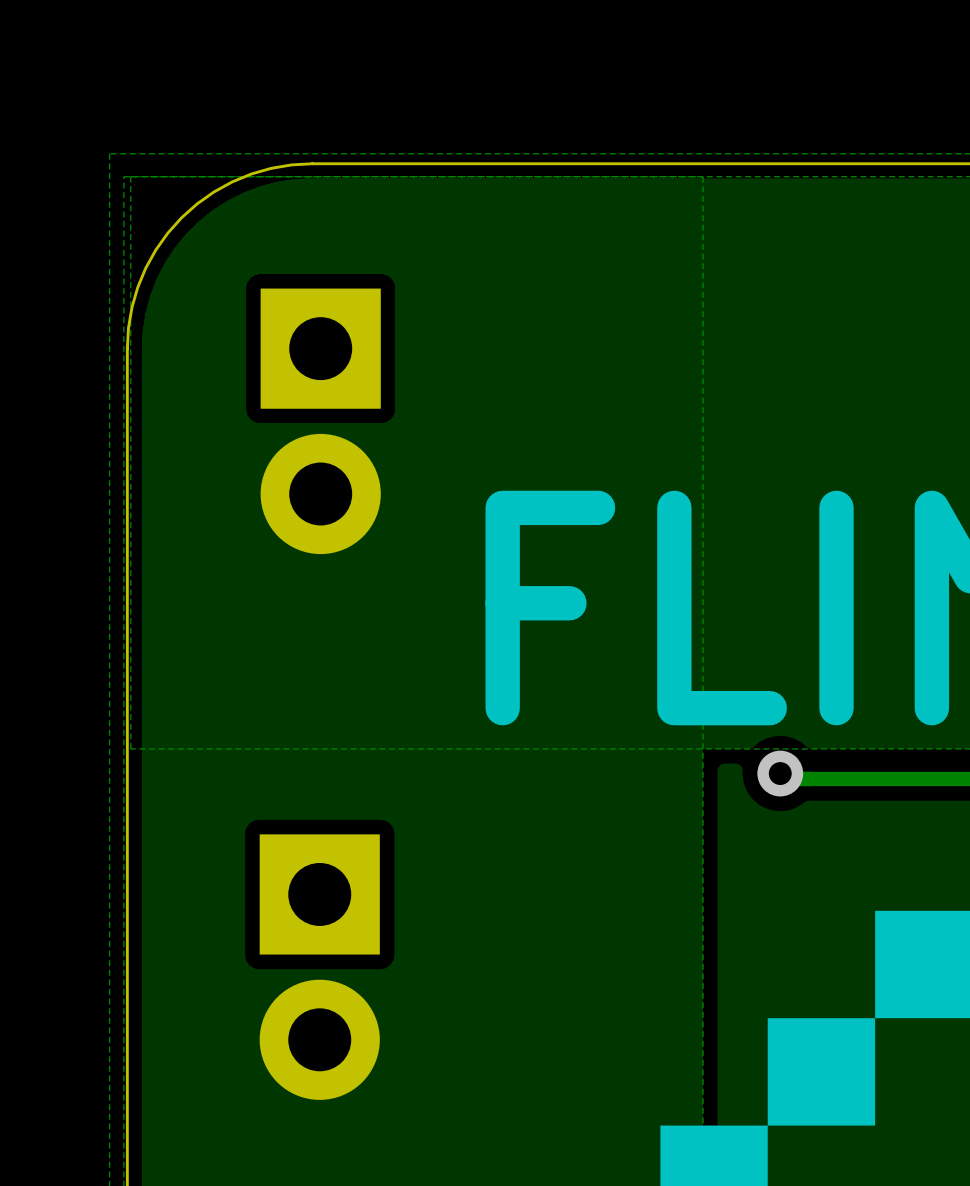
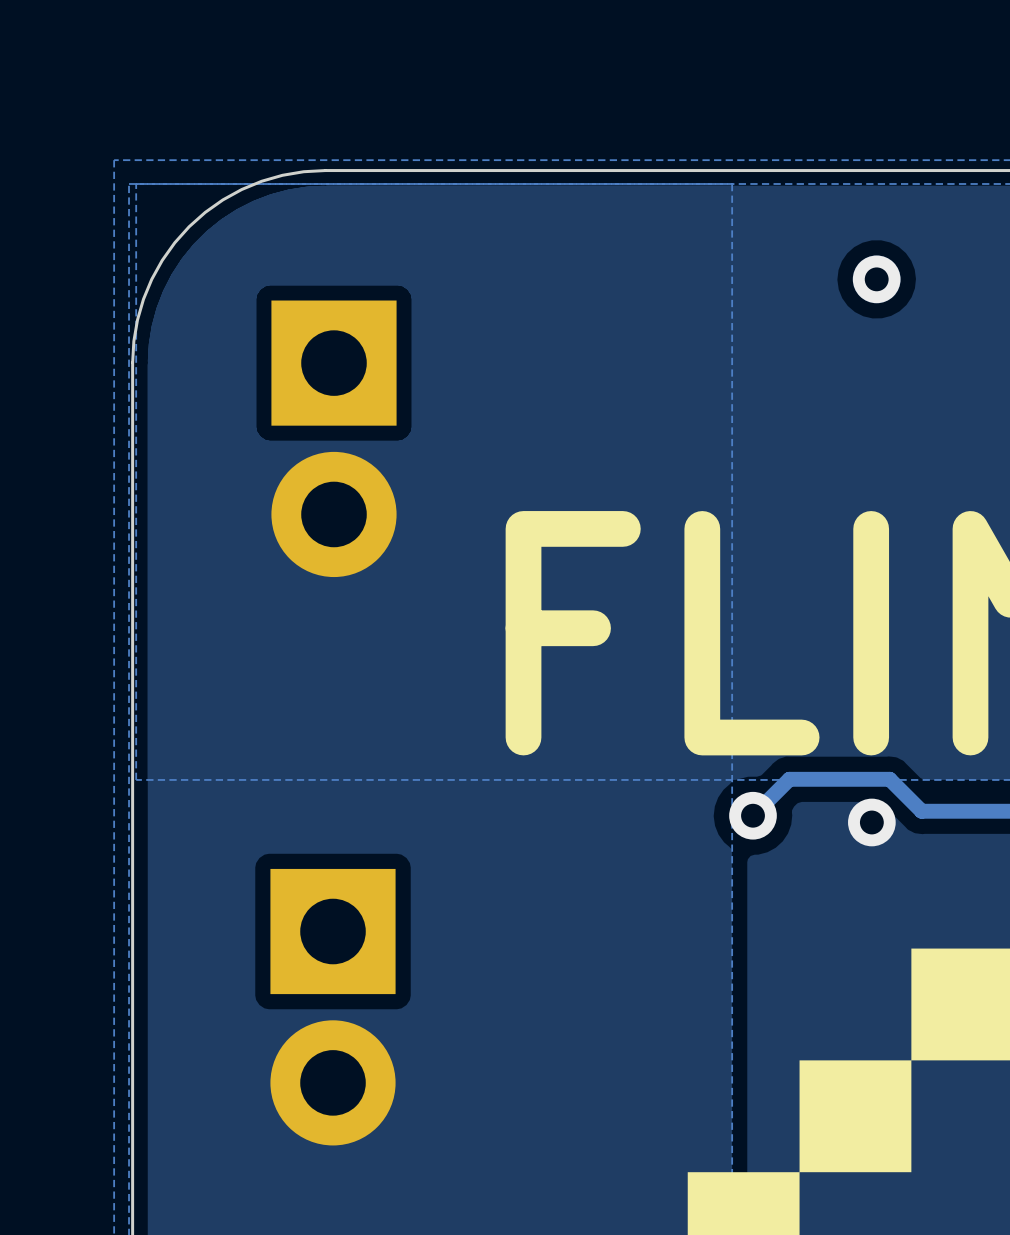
via: none -> (876, 279)
track: (780, 773) (781, 777) (785, 778) (885, 778) -> (752, 815) (789, 779) (889, 779) (921, 811)
via: (780, 773) -> none
via: none -> (752, 815)
via: none -> (871, 822)

